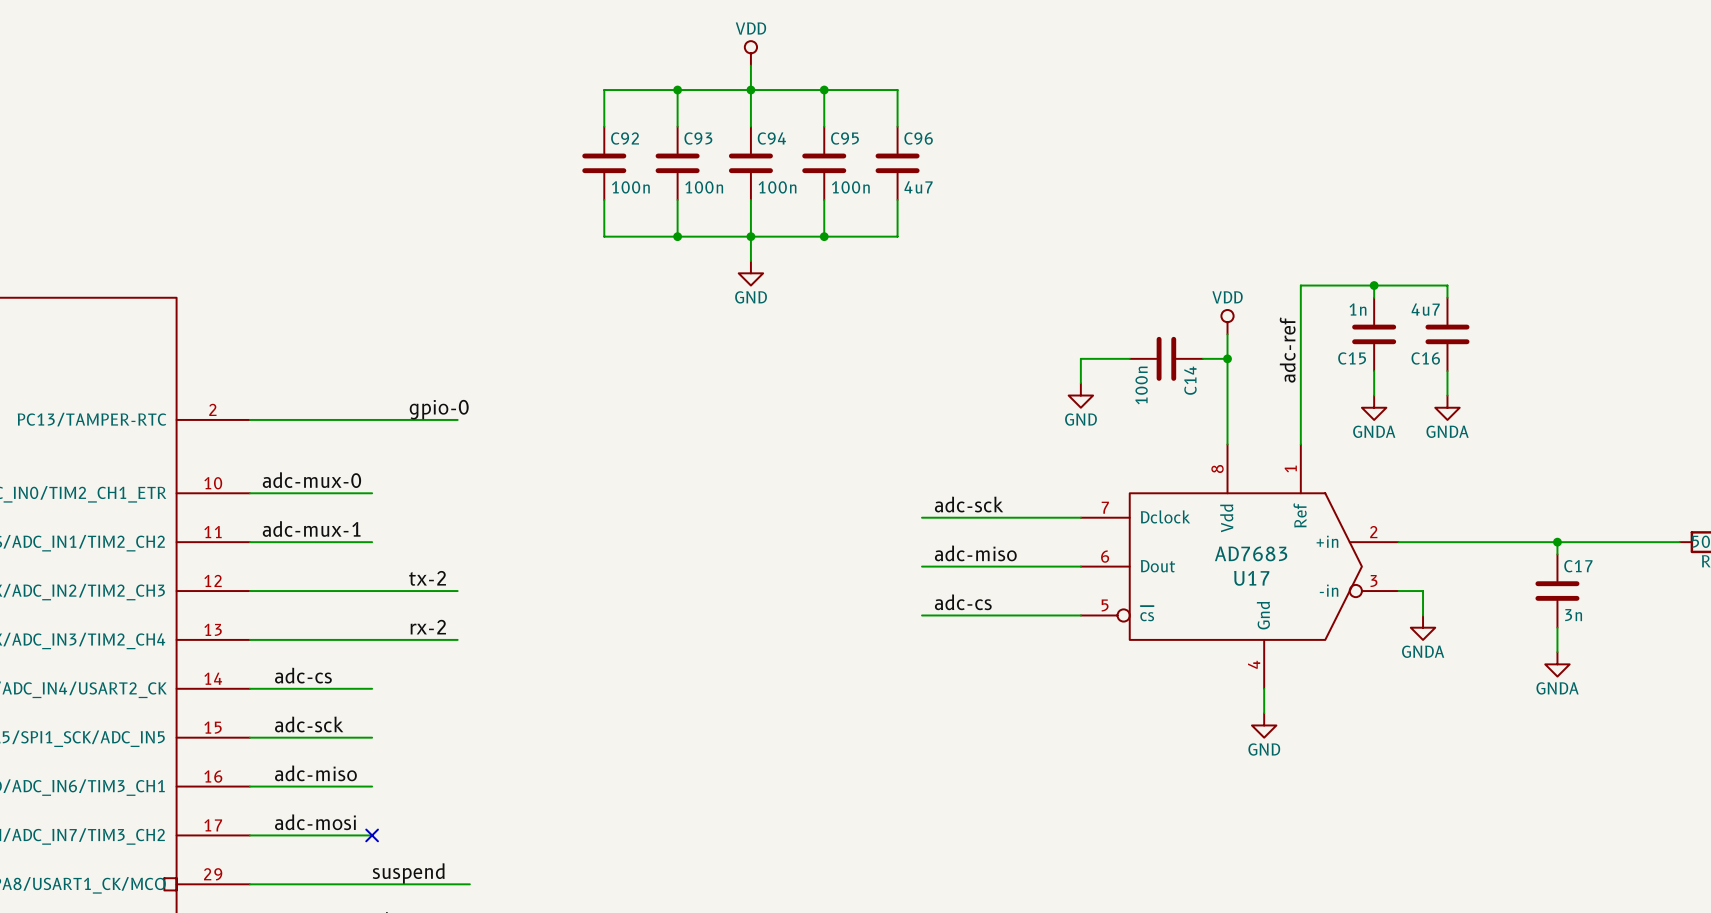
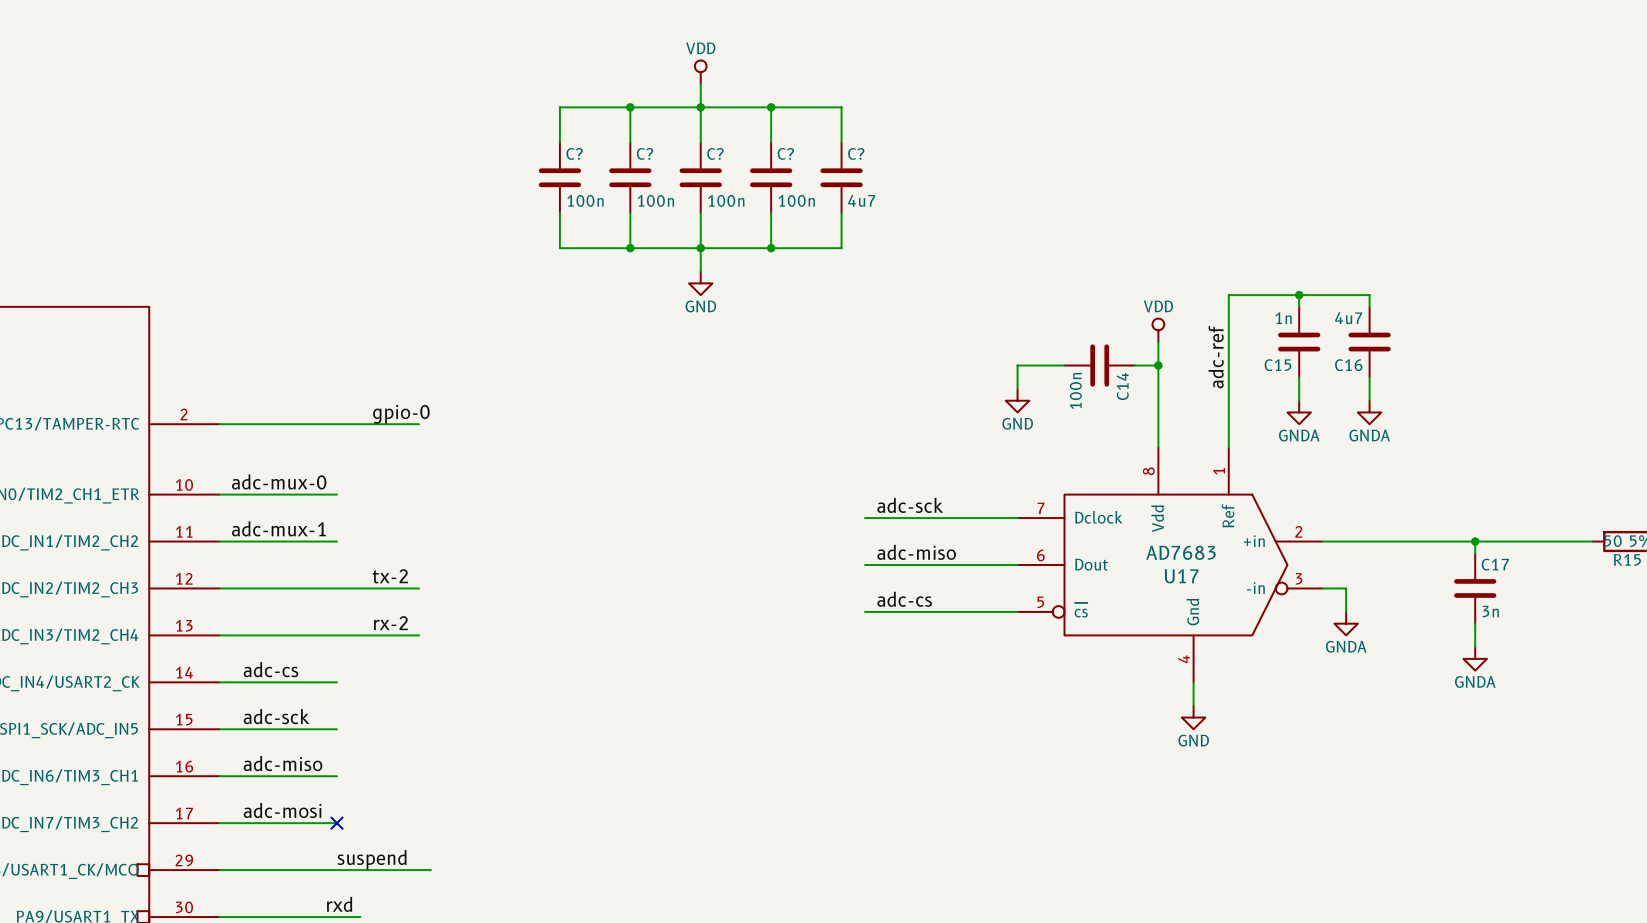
C92 name: C92 (625, 138) -> C? (574, 153)
C93 name: C93 (698, 138) -> C? (645, 153)
C94 name: C94 (771, 138) -> C? (715, 153)
C95 name: C95 (844, 138) -> C? (785, 153)
C96 name: C96 (918, 138) -> C? (856, 153)

